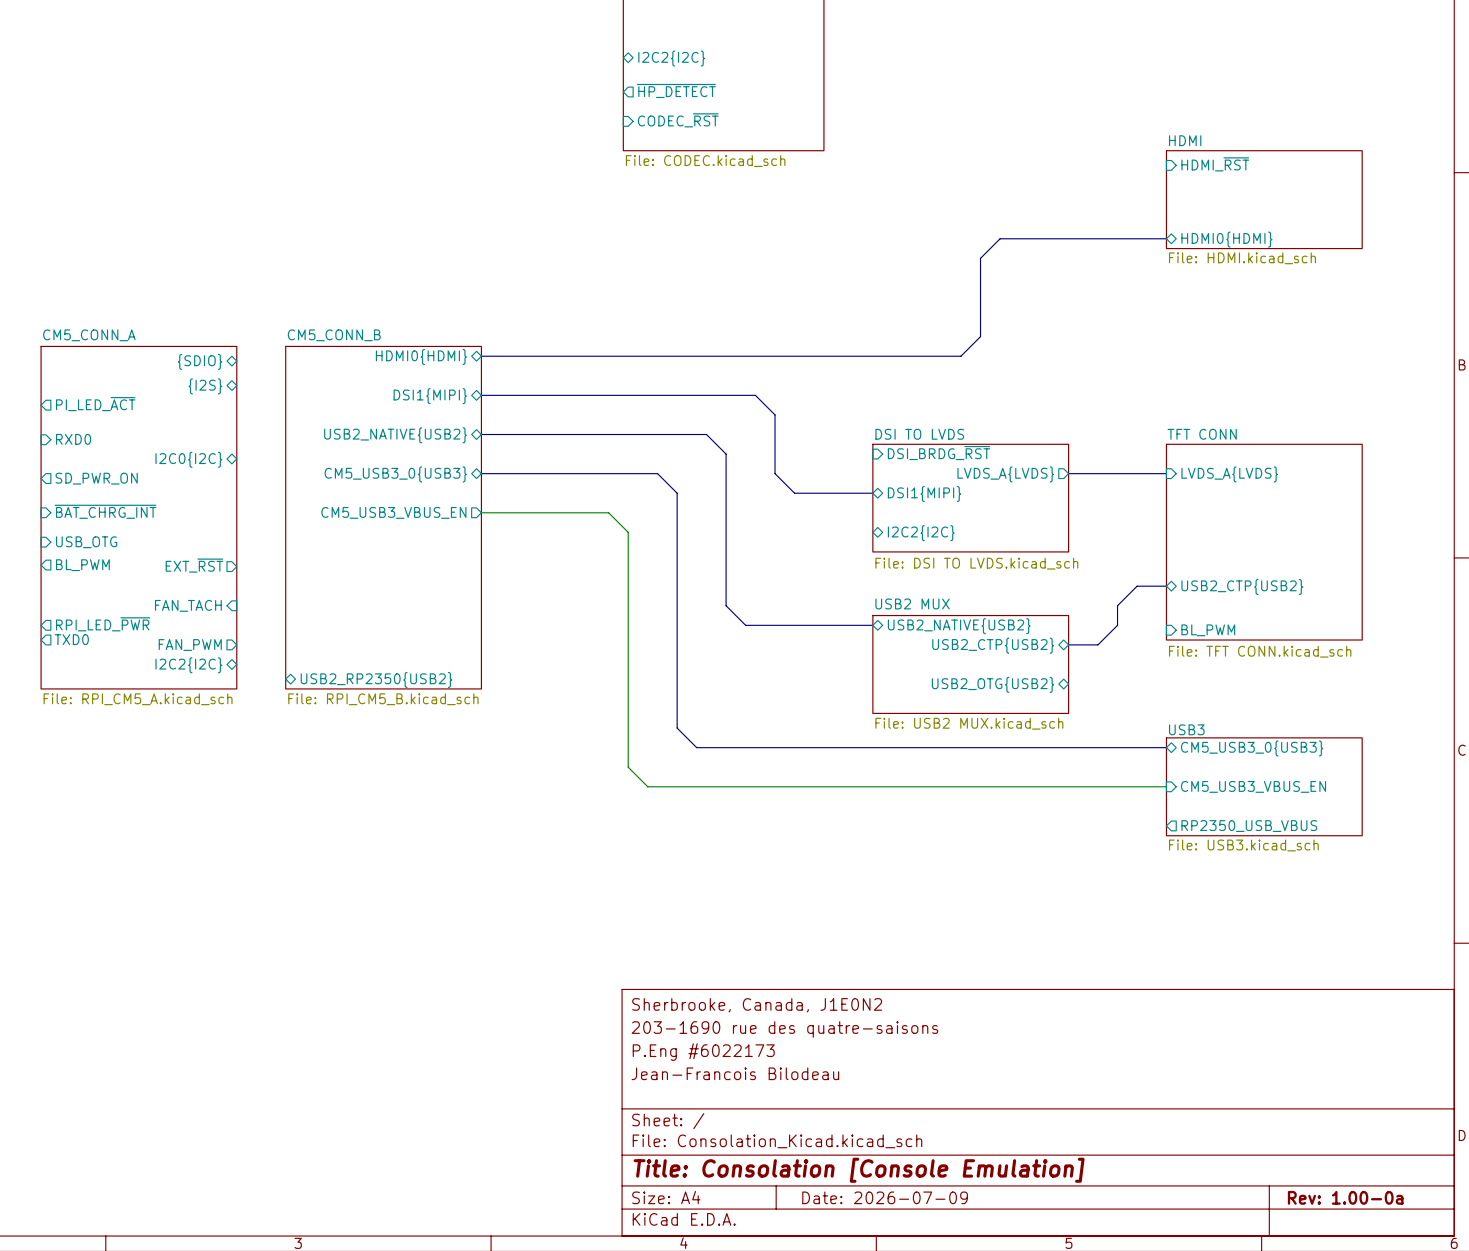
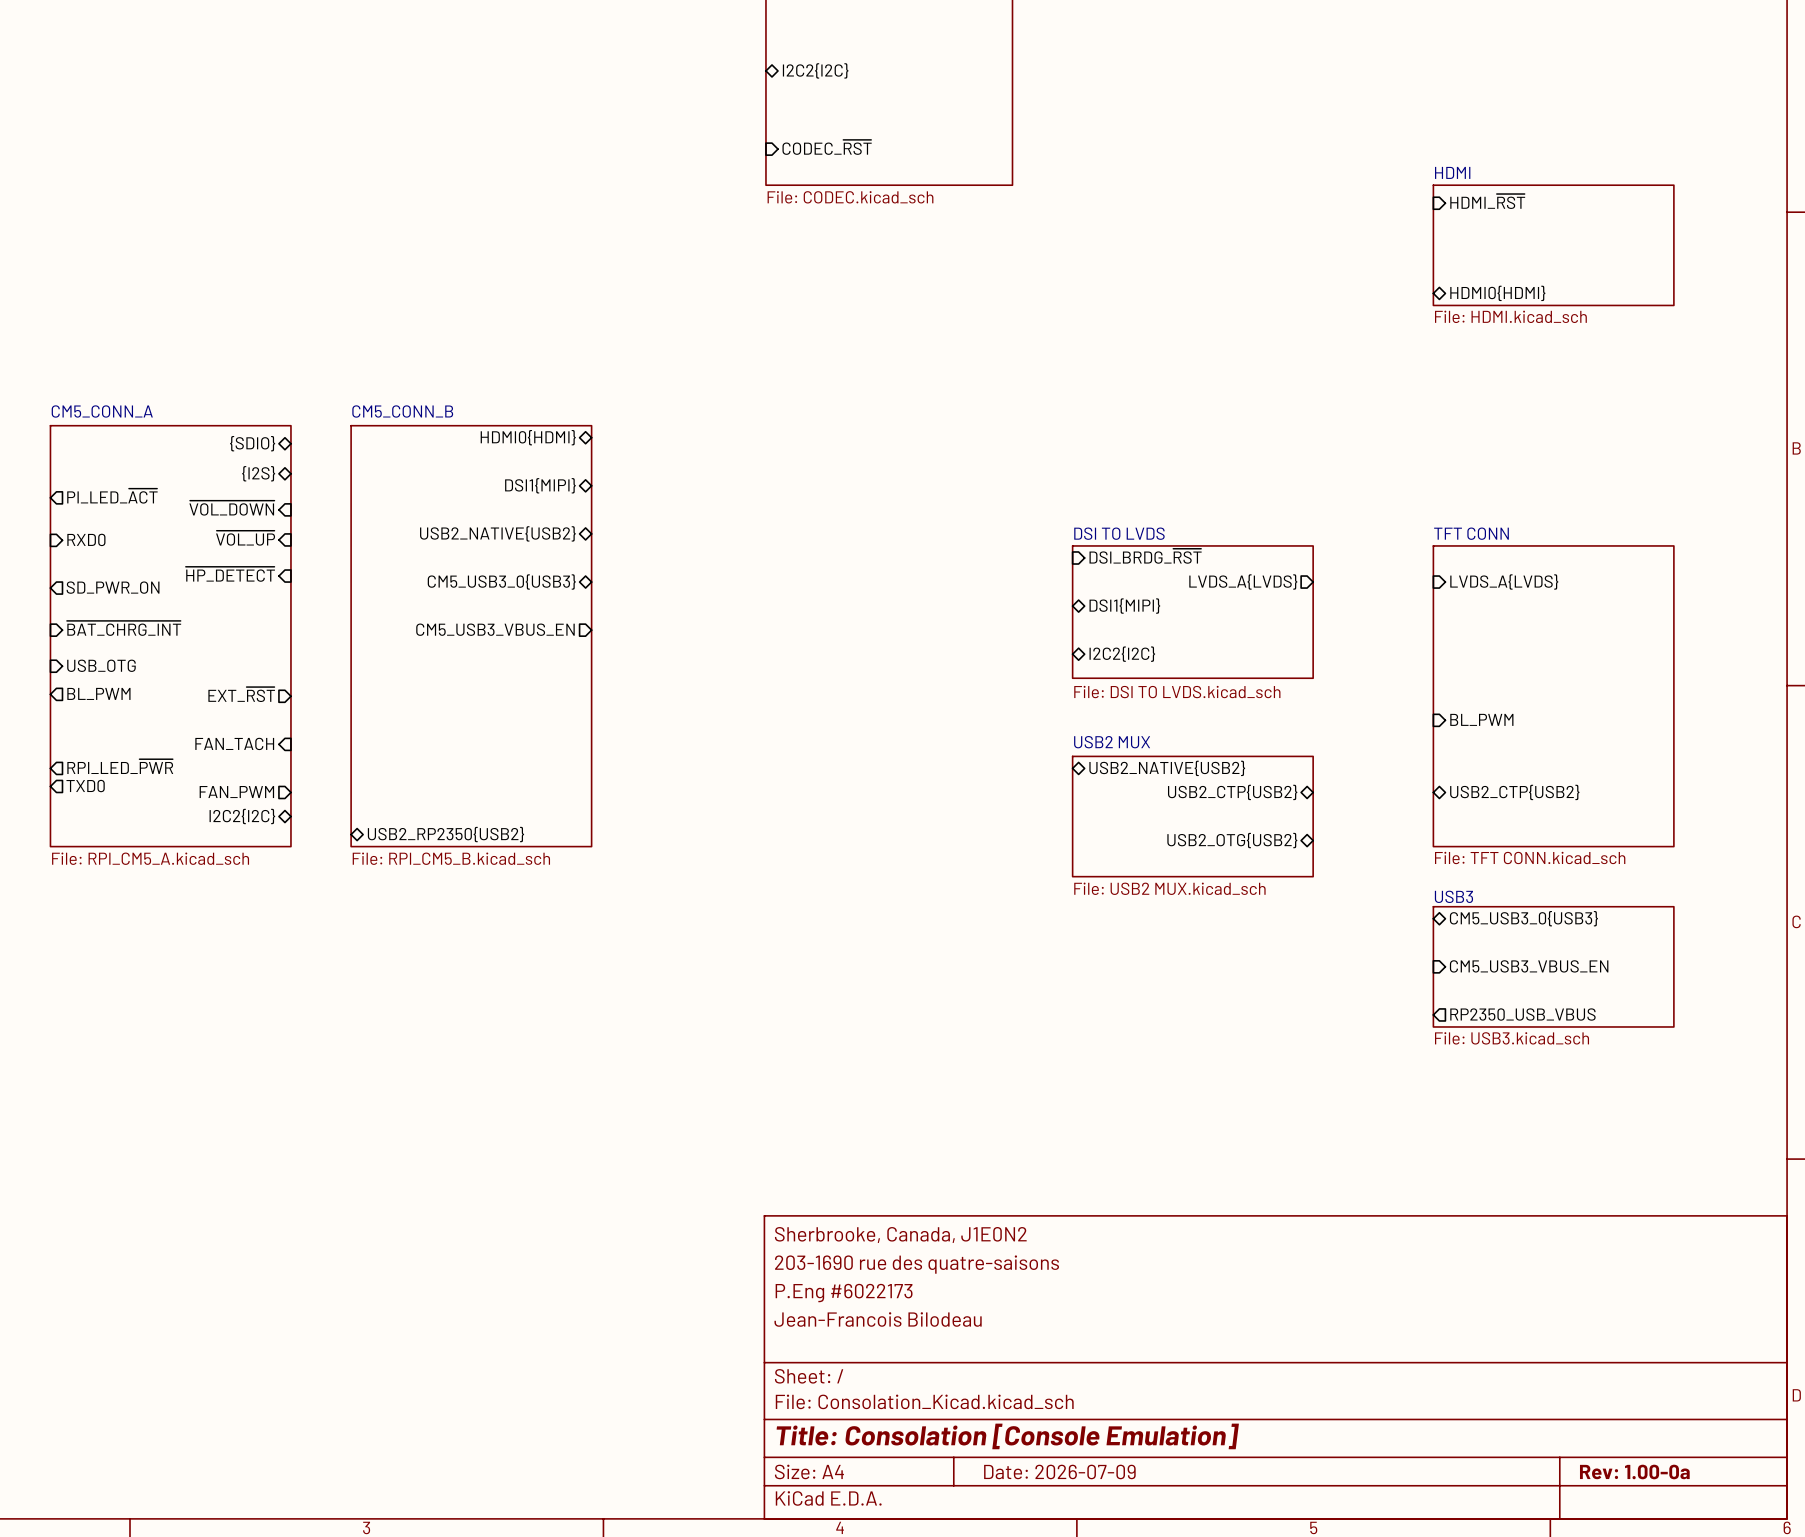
sheet pin: ~{HP_DETECT} (676, 90) -> none
bus: (1166, 238) (1000, 238) (980, 258) (980, 336) (960, 356) (481, 356) -> none
bus: (481, 395) (755, 395) (775, 414) (775, 473) (794, 493) (872, 493) -> none
sheet pin: none -> ~{VOL_DOWN} (231, 508)
bus: (481, 434) (706, 434) (726, 454) (726, 605) (745, 625) (872, 625) -> none
sheet pin: none -> ~{VOL_UP} (245, 538)
sheet pin: I2C0{I2C} (188, 459) -> none
sheet pin: none -> ~{HP_DETECT} (230, 574)
bus: (481, 473) (657, 473) (677, 493) (677, 728) (696, 747) (1166, 747) -> none
bus: (1068, 473) (1166, 473) -> none
wire: (481, 512) (608, 512) (628, 532) (628, 767) (647, 786) (1166, 786) -> none
sheet TFT CONN: File: TFT CONN.kicad_sch (1264, 542) -> none
sheet TFT CONN: none -> File: TFT CONN.kicad_sch (1553, 696)
bus: (1166, 586) (1137, 586) (1117, 605) (1117, 625) (1097, 644) (1068, 644) -> none
sheet pin shape: bidirectional (1242, 586) -> input (1481, 719)
sheet pin: USB2_CTP{USB2} (1242, 586) -> BL_PWM (1481, 719)
sheet pin: BL_PWM (1208, 630) -> none
sheet pin: none -> USB2_CTP{USB2} (1514, 792)

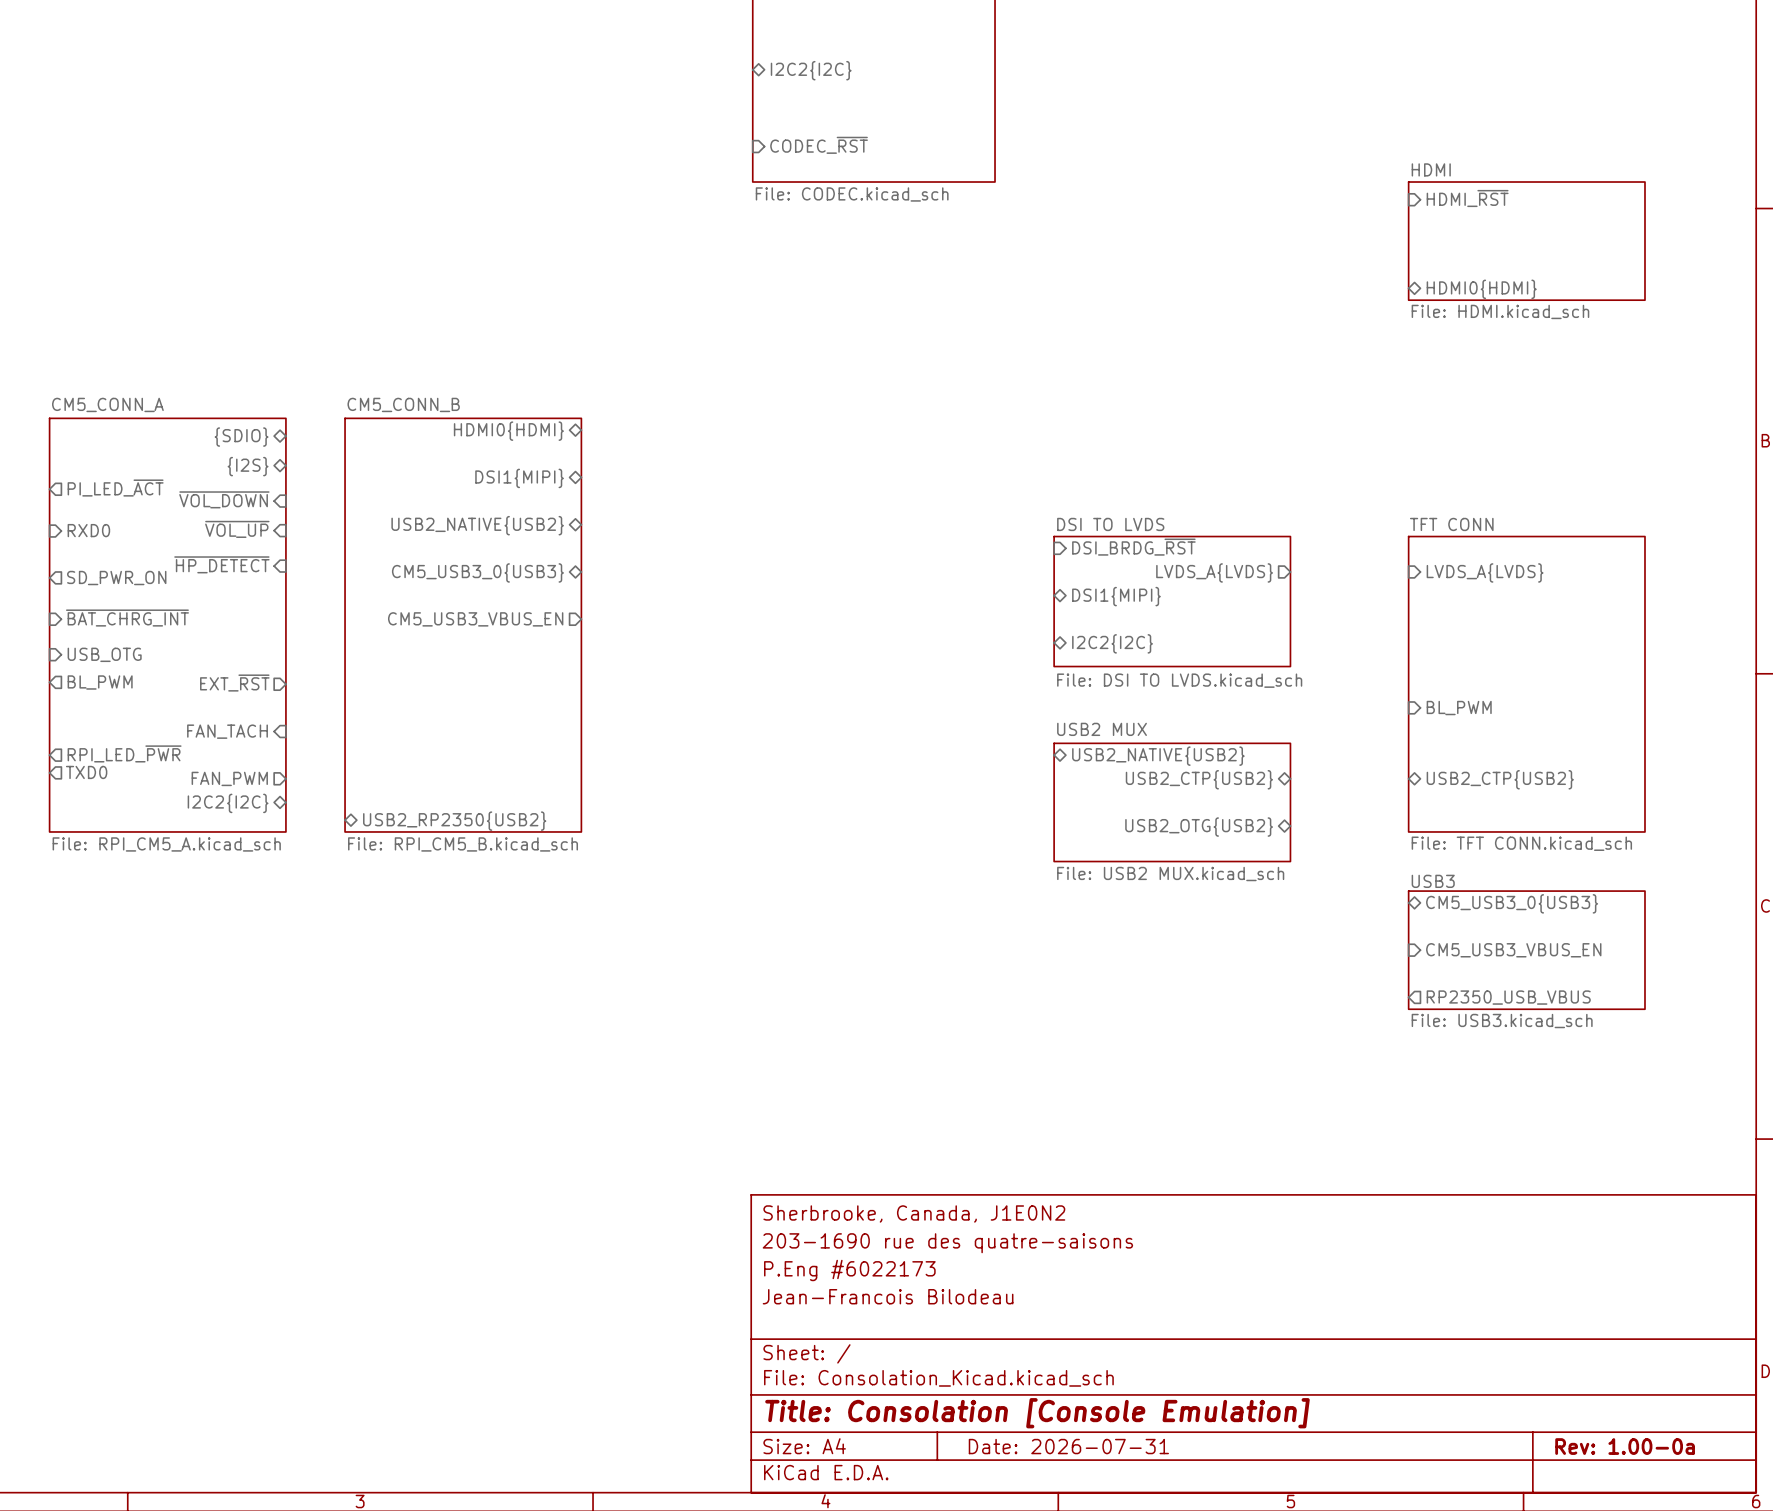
title block: Date: 2026-07-09 (1059, 1471) -> Date: 2026-07-31 (1068, 1446)

